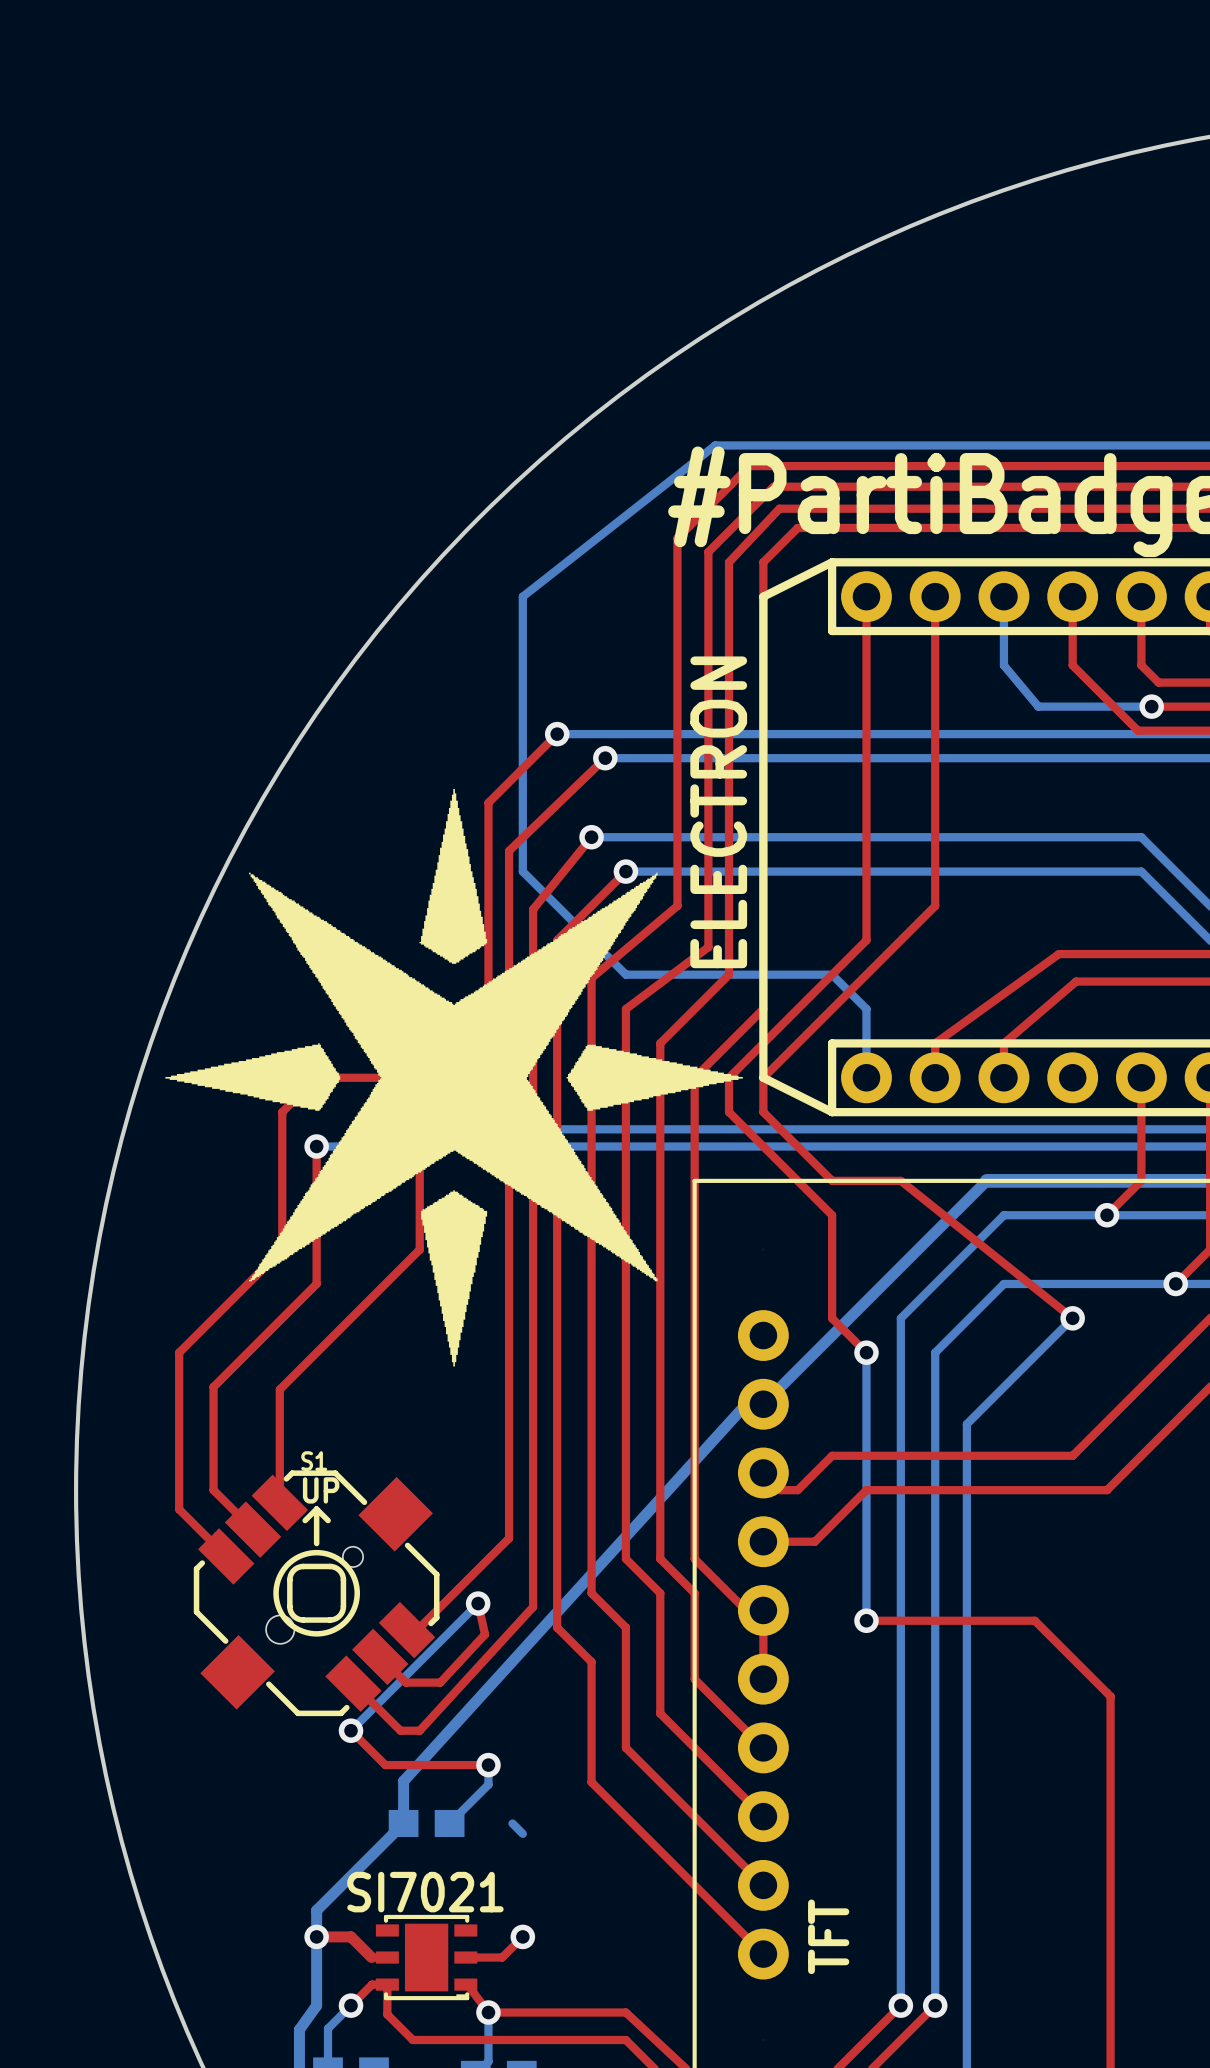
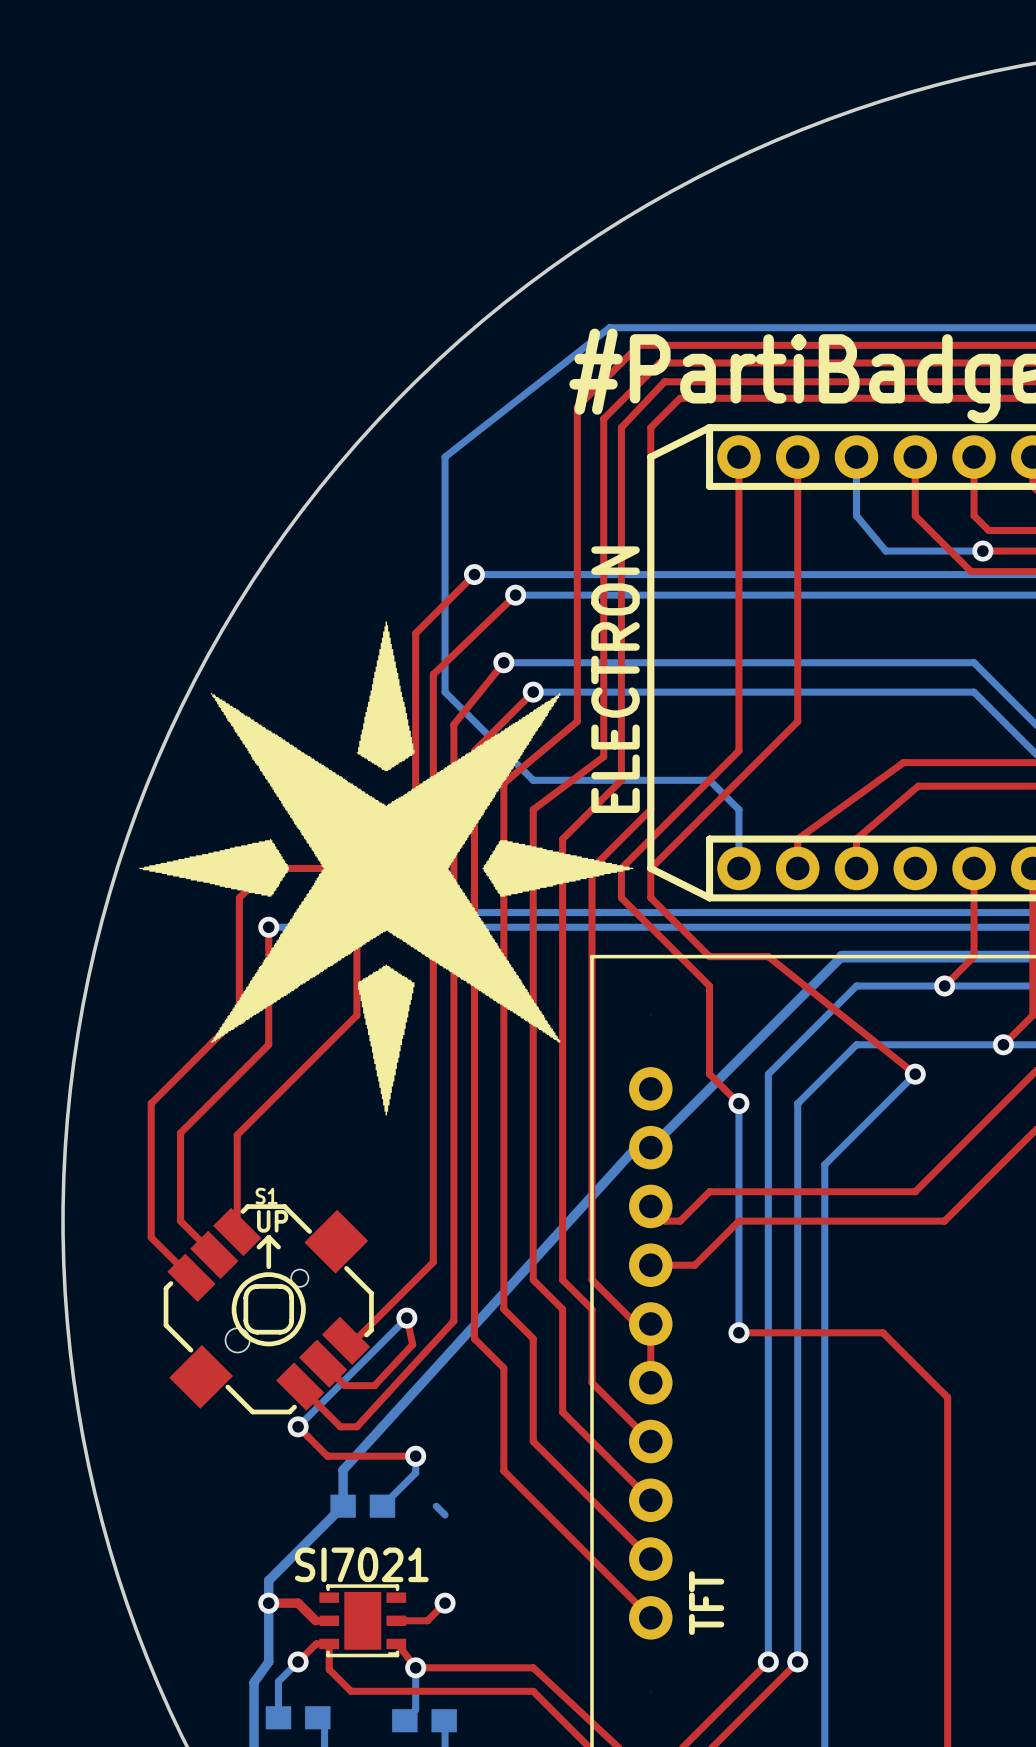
ELECTRON name position: ELECTRON (718, 812) -> ELECTRON (615, 679)

